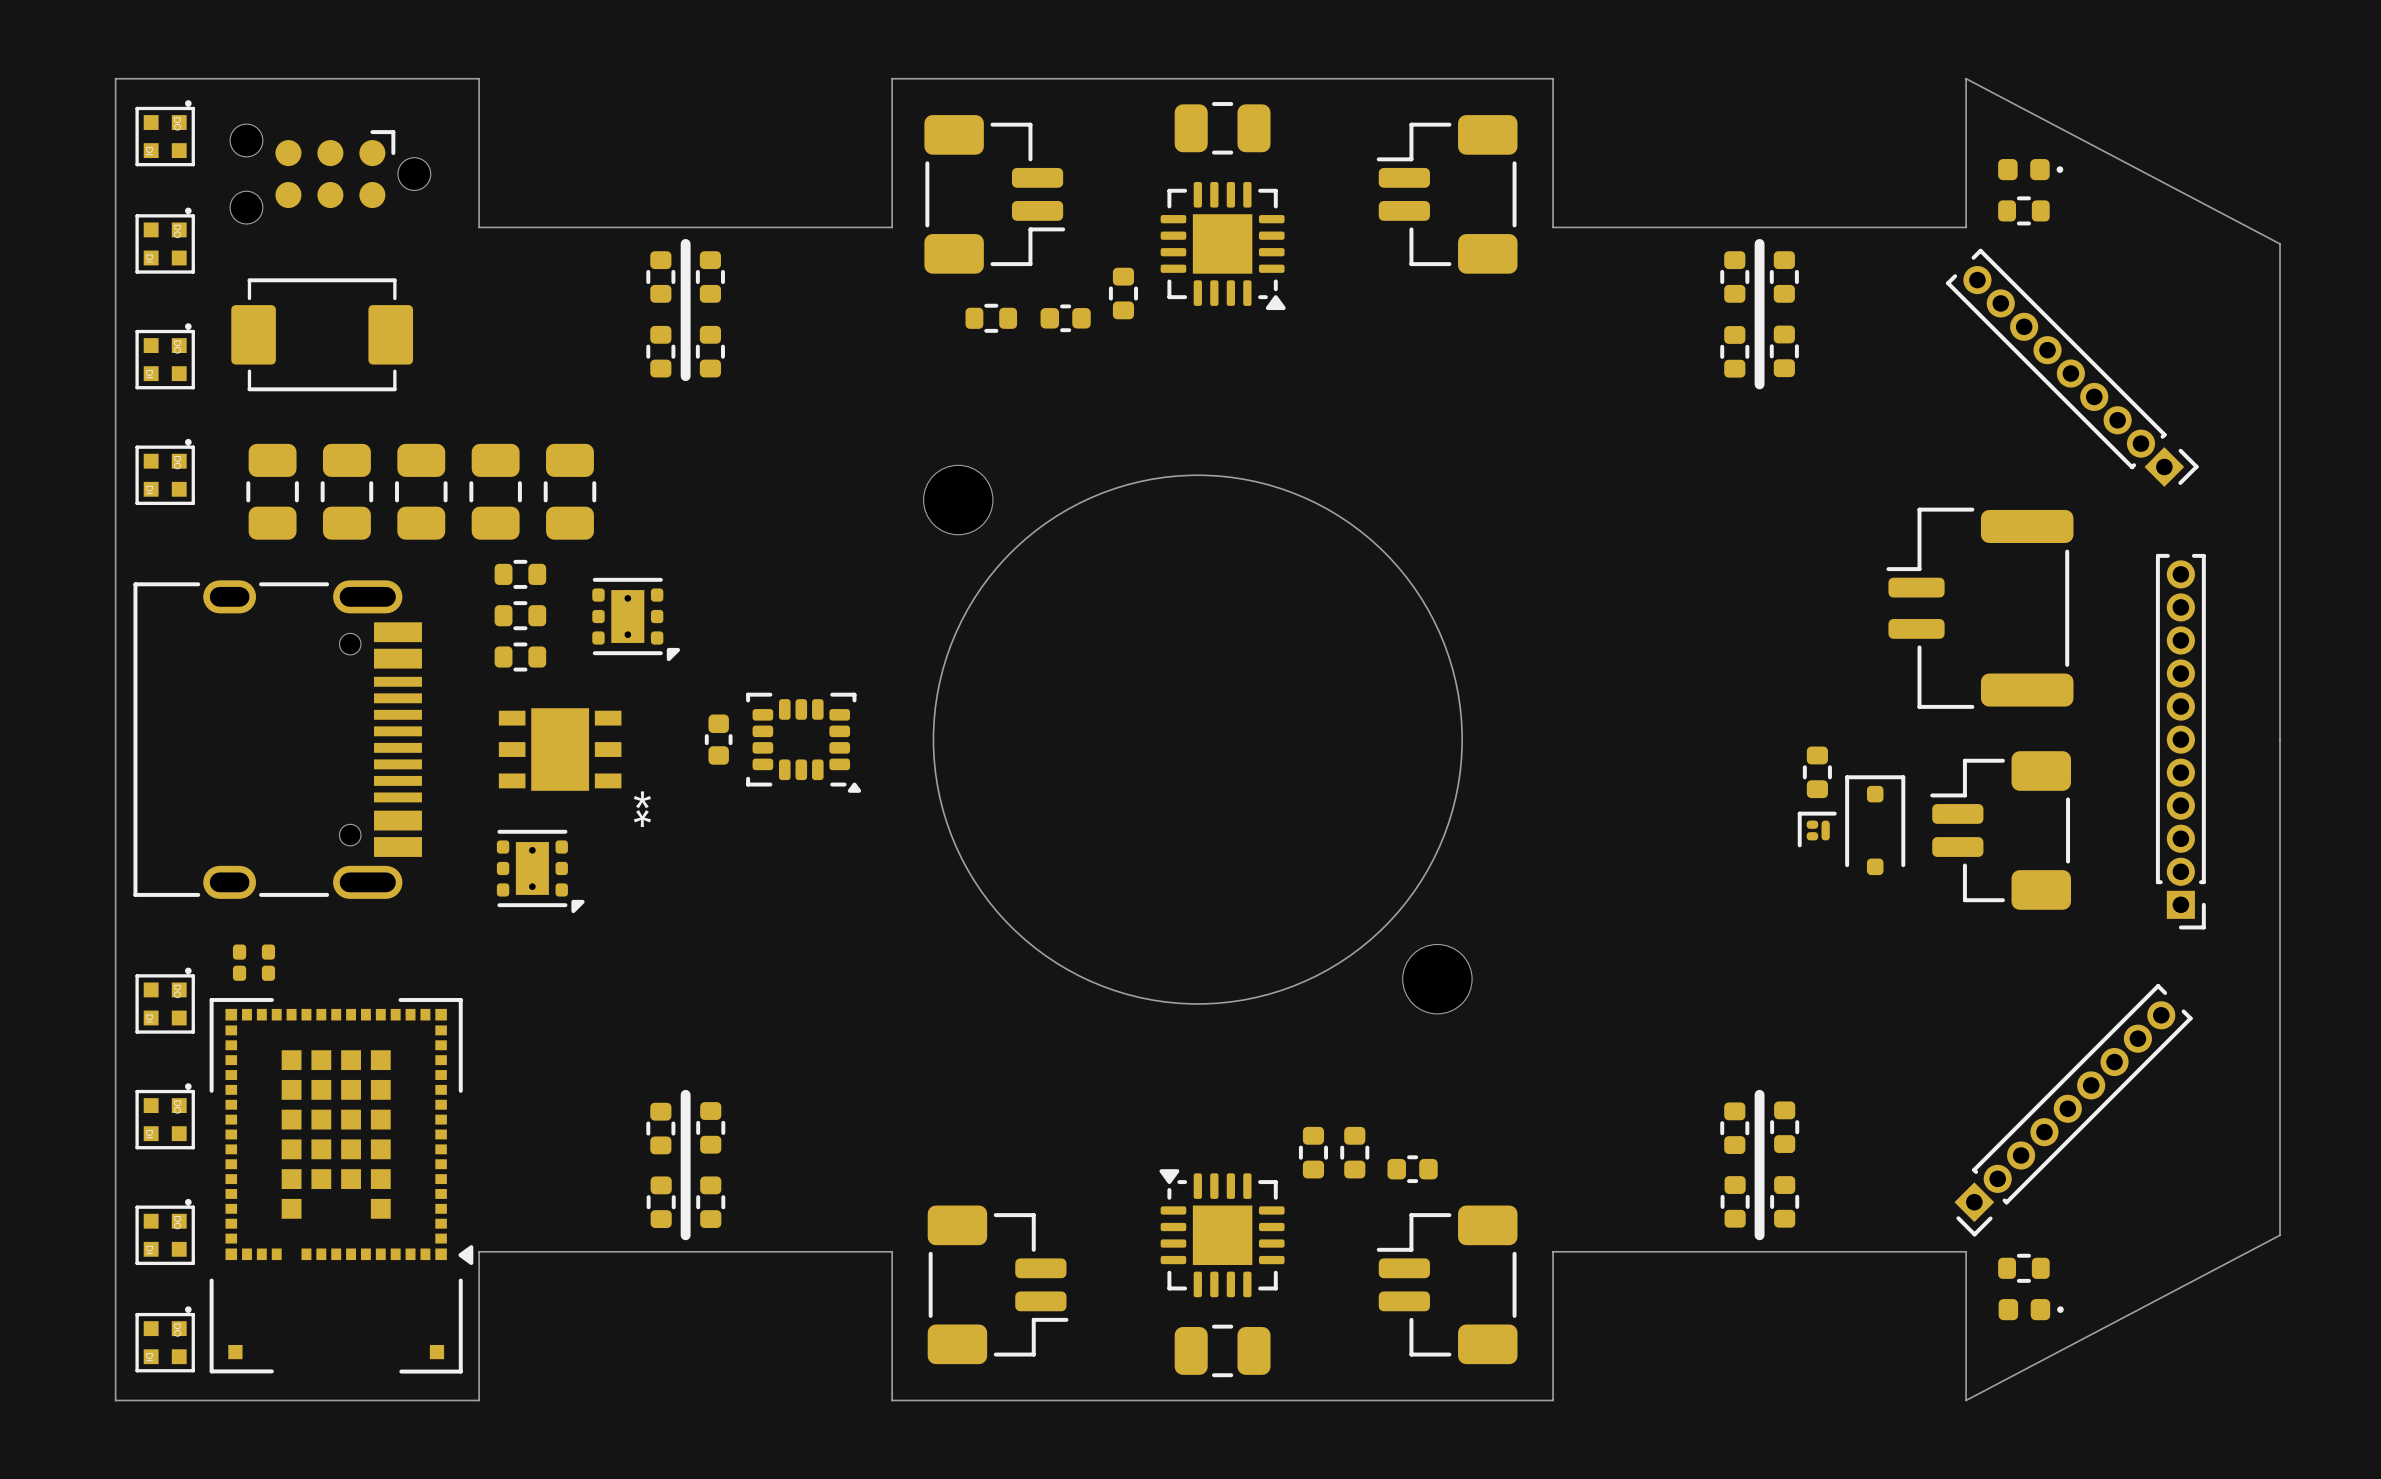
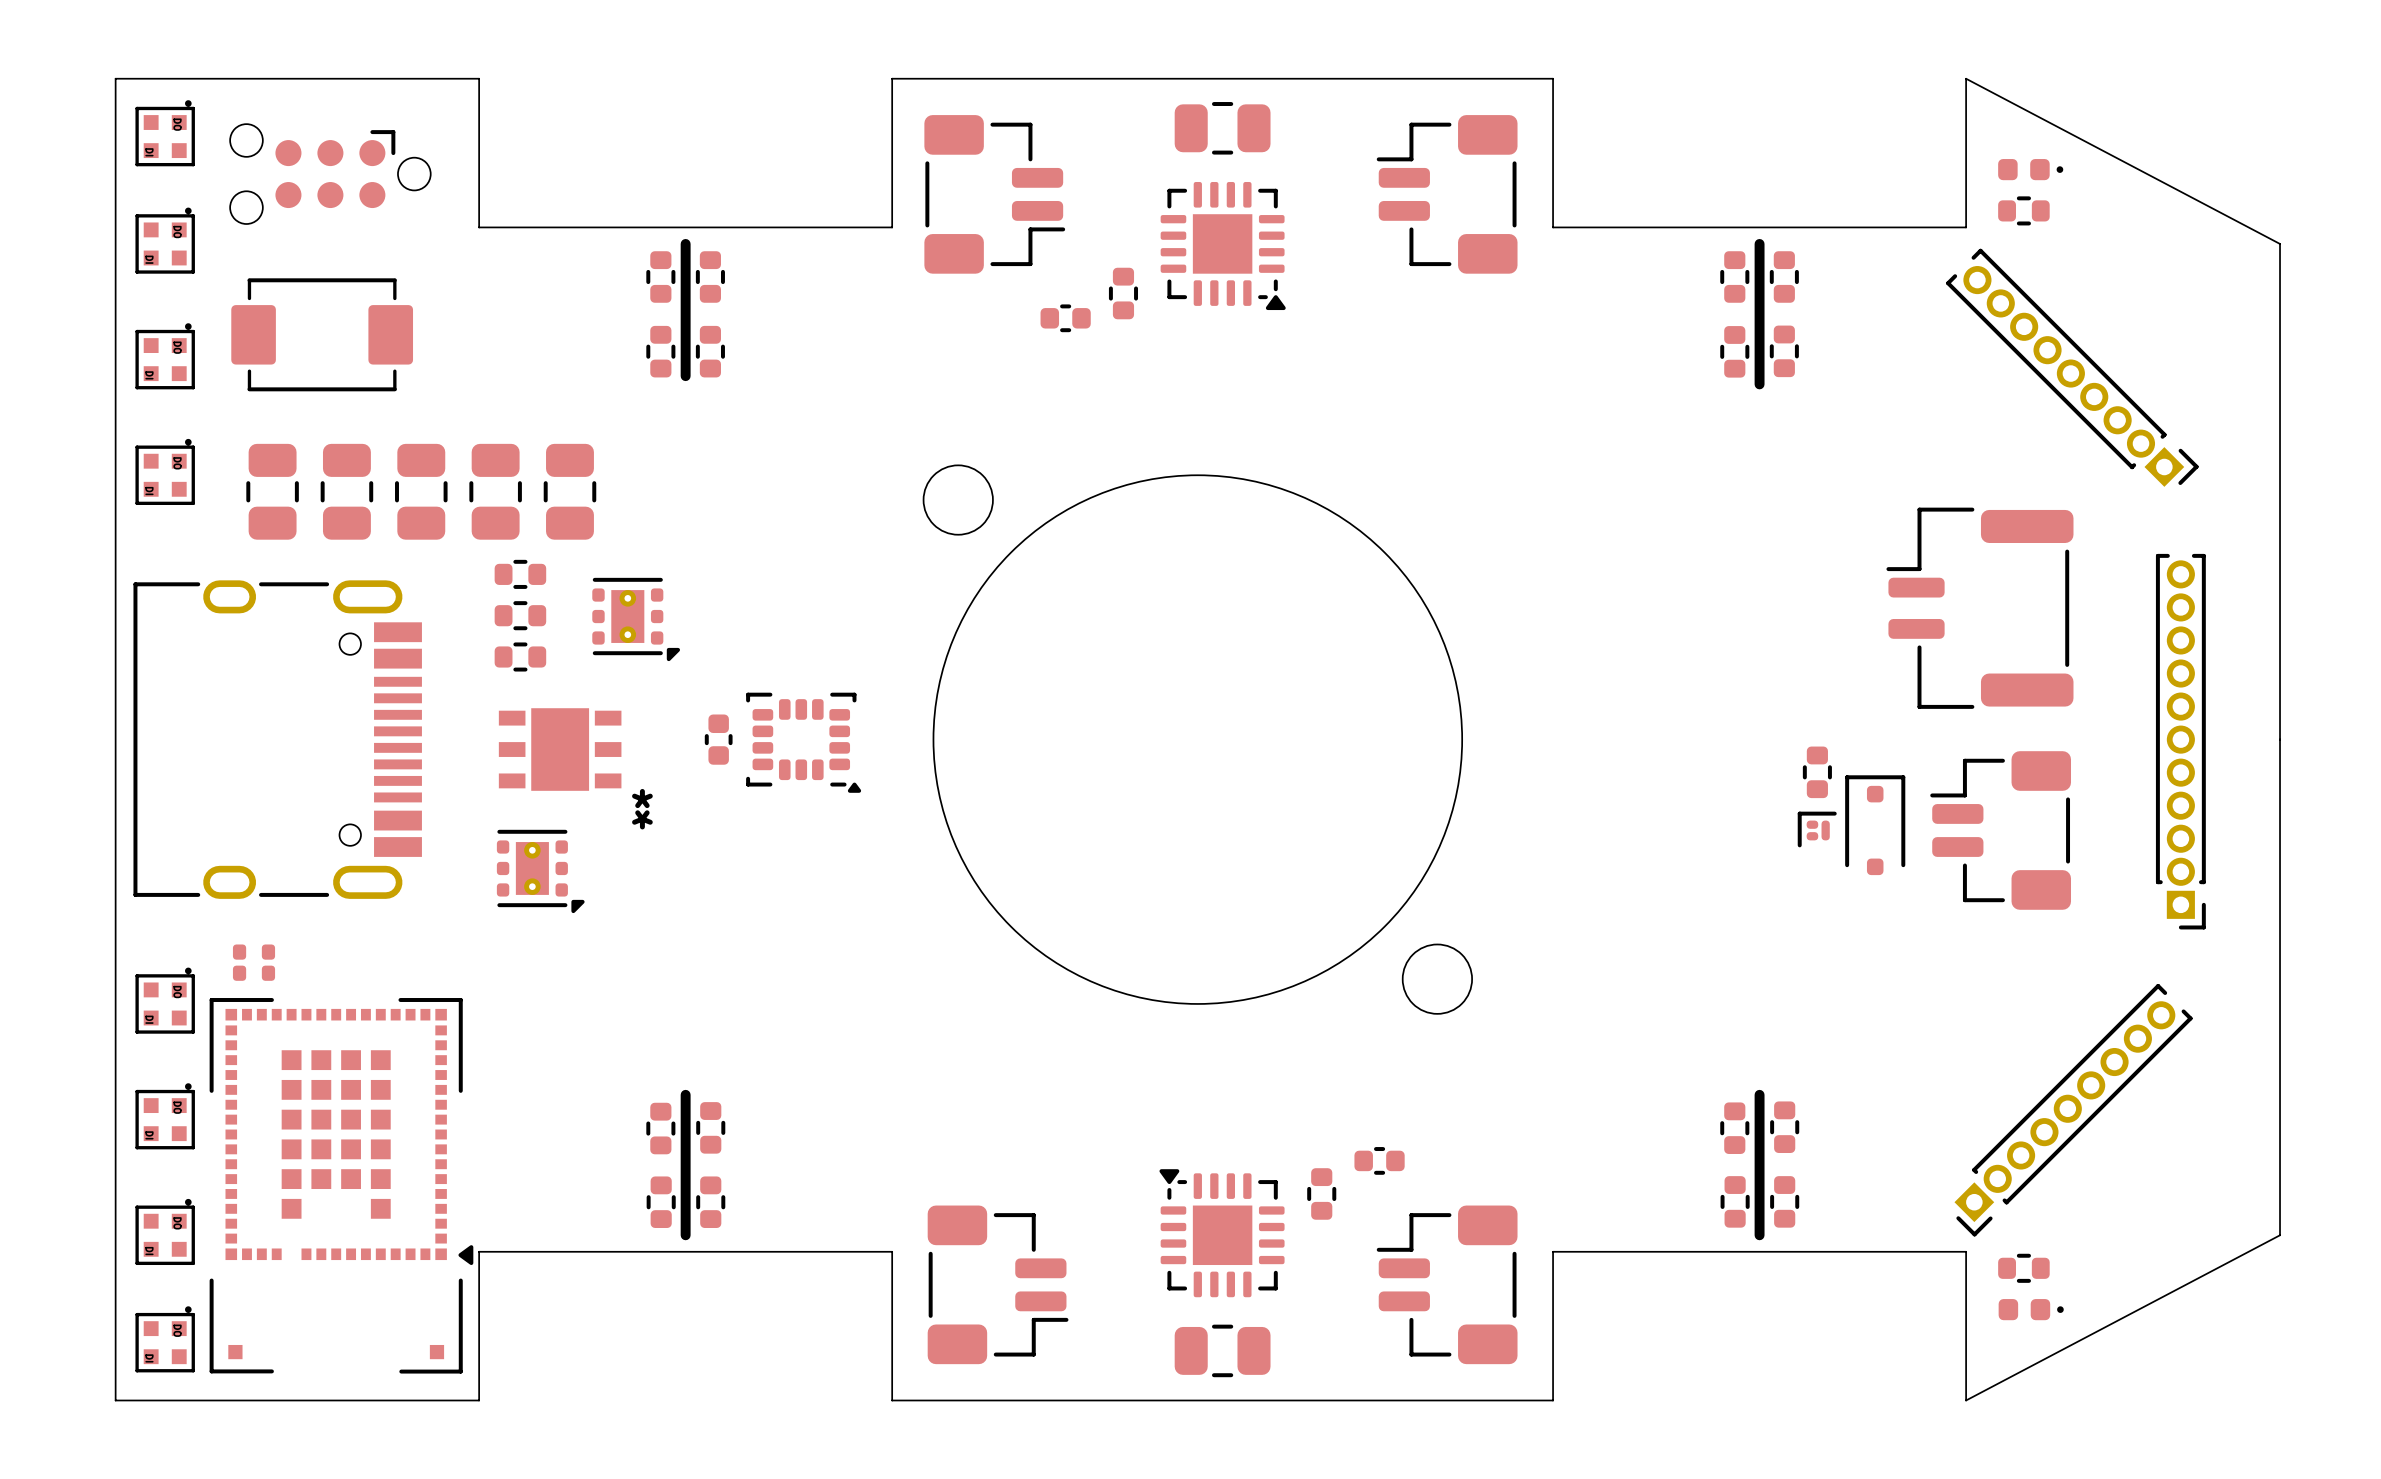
part: (991, 318) -> none
part: (1313, 1152) -> none
part: (1354, 1152) -> none
part position: (1412, 1169) -> (1379, 1160)
part: none -> (1321, 1193)

